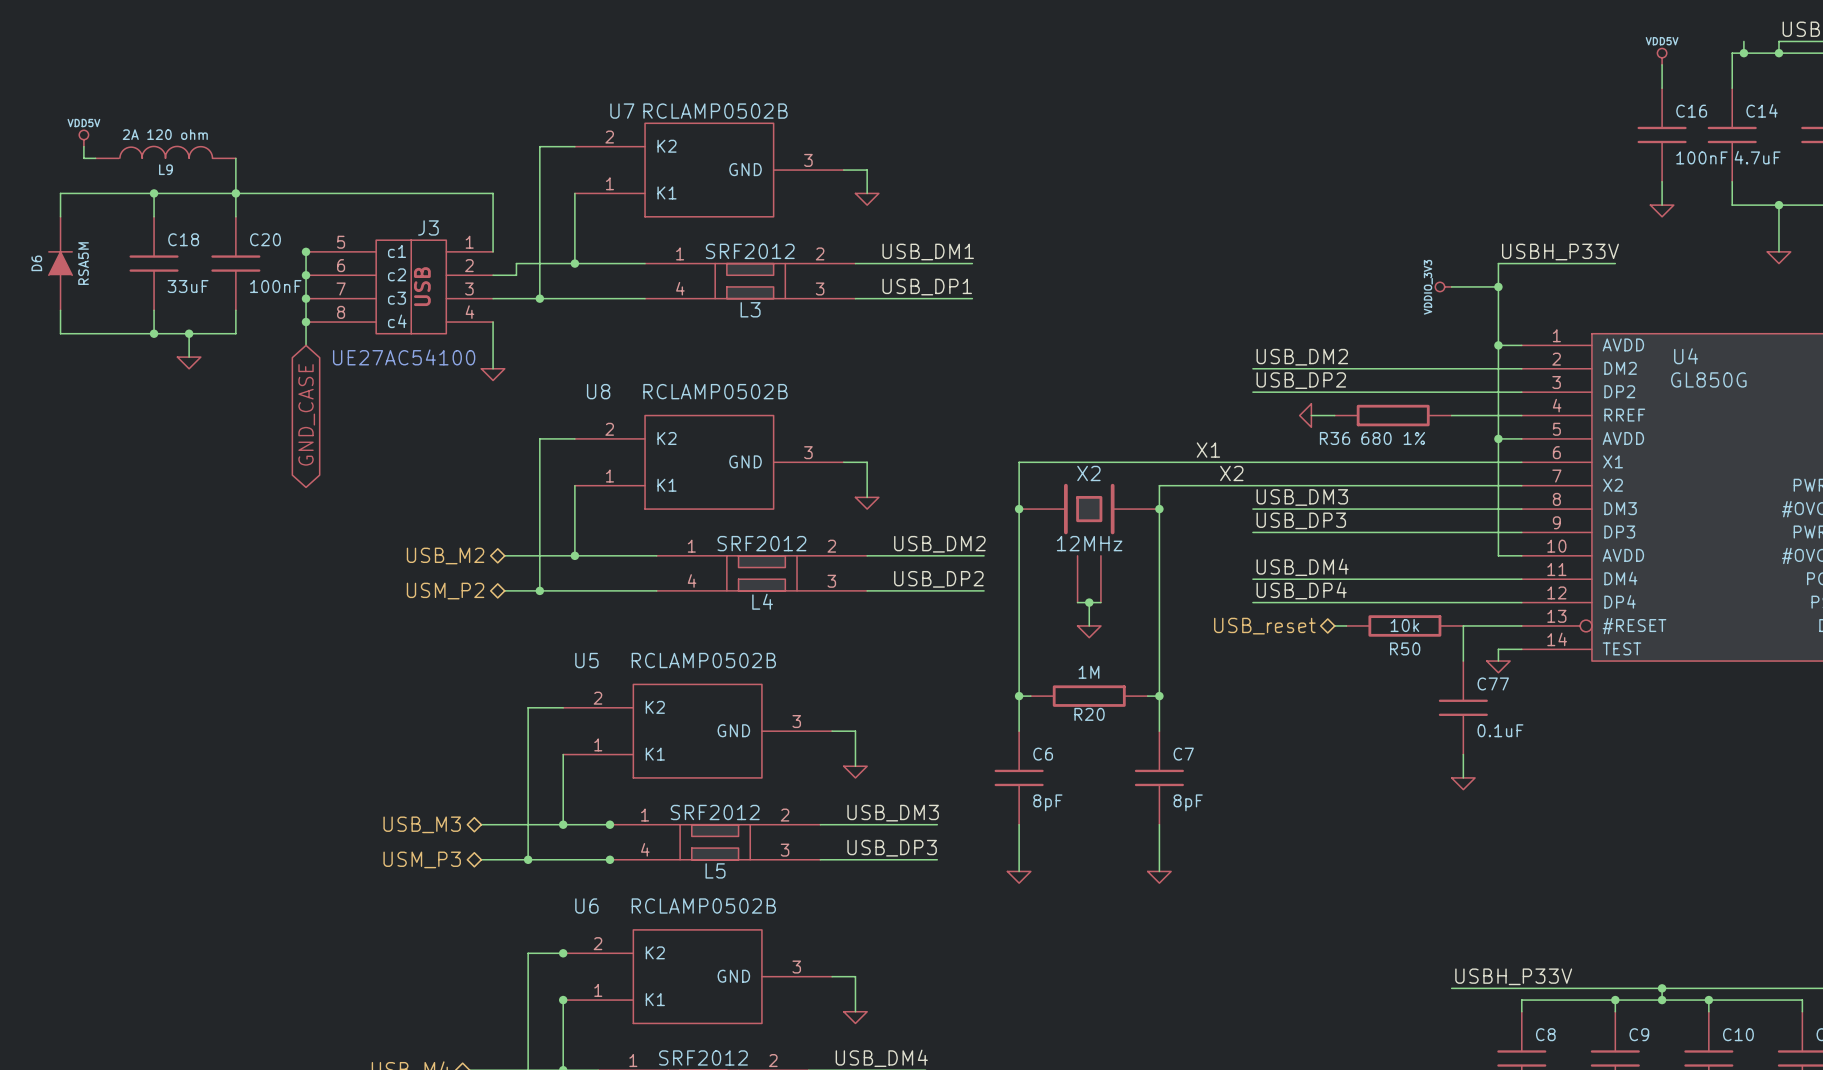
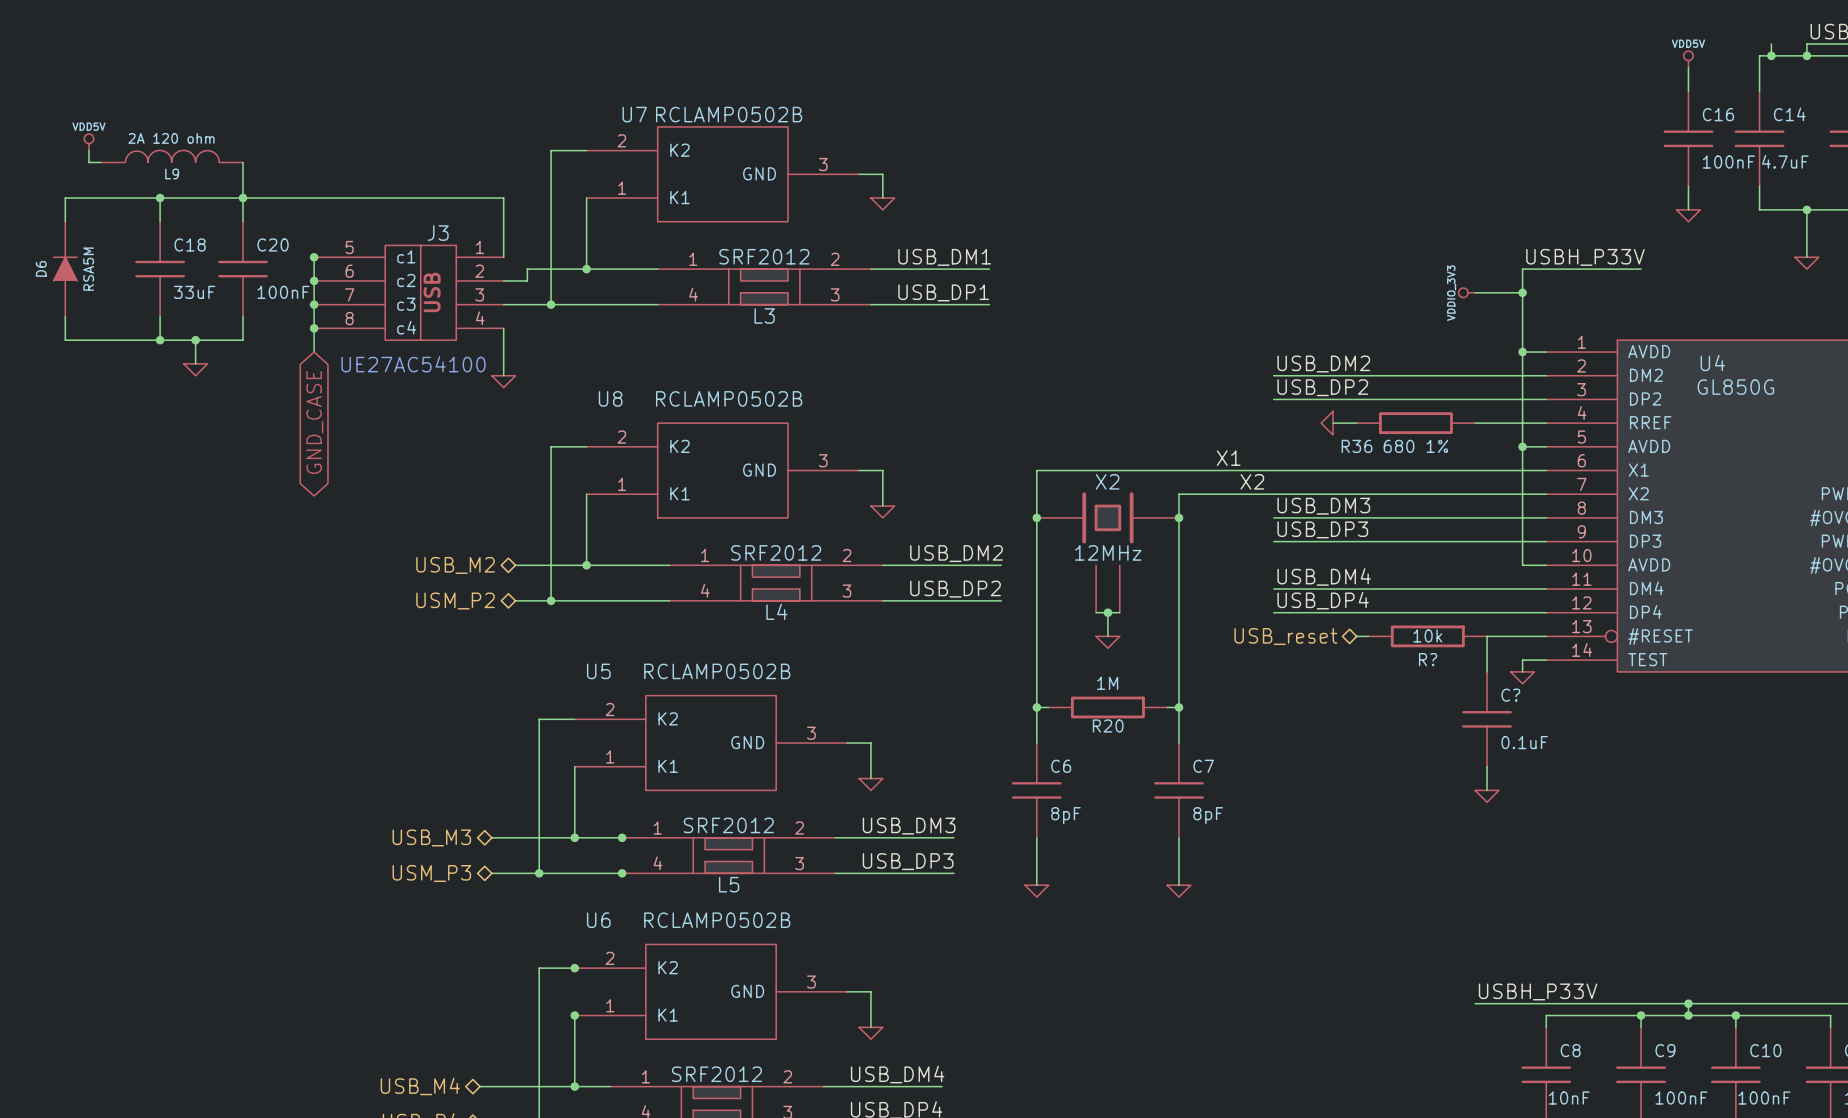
R50 name: R50 (1405, 648) -> R? (1428, 659)
C77 name: C77 (1493, 683) -> C? (1510, 695)

